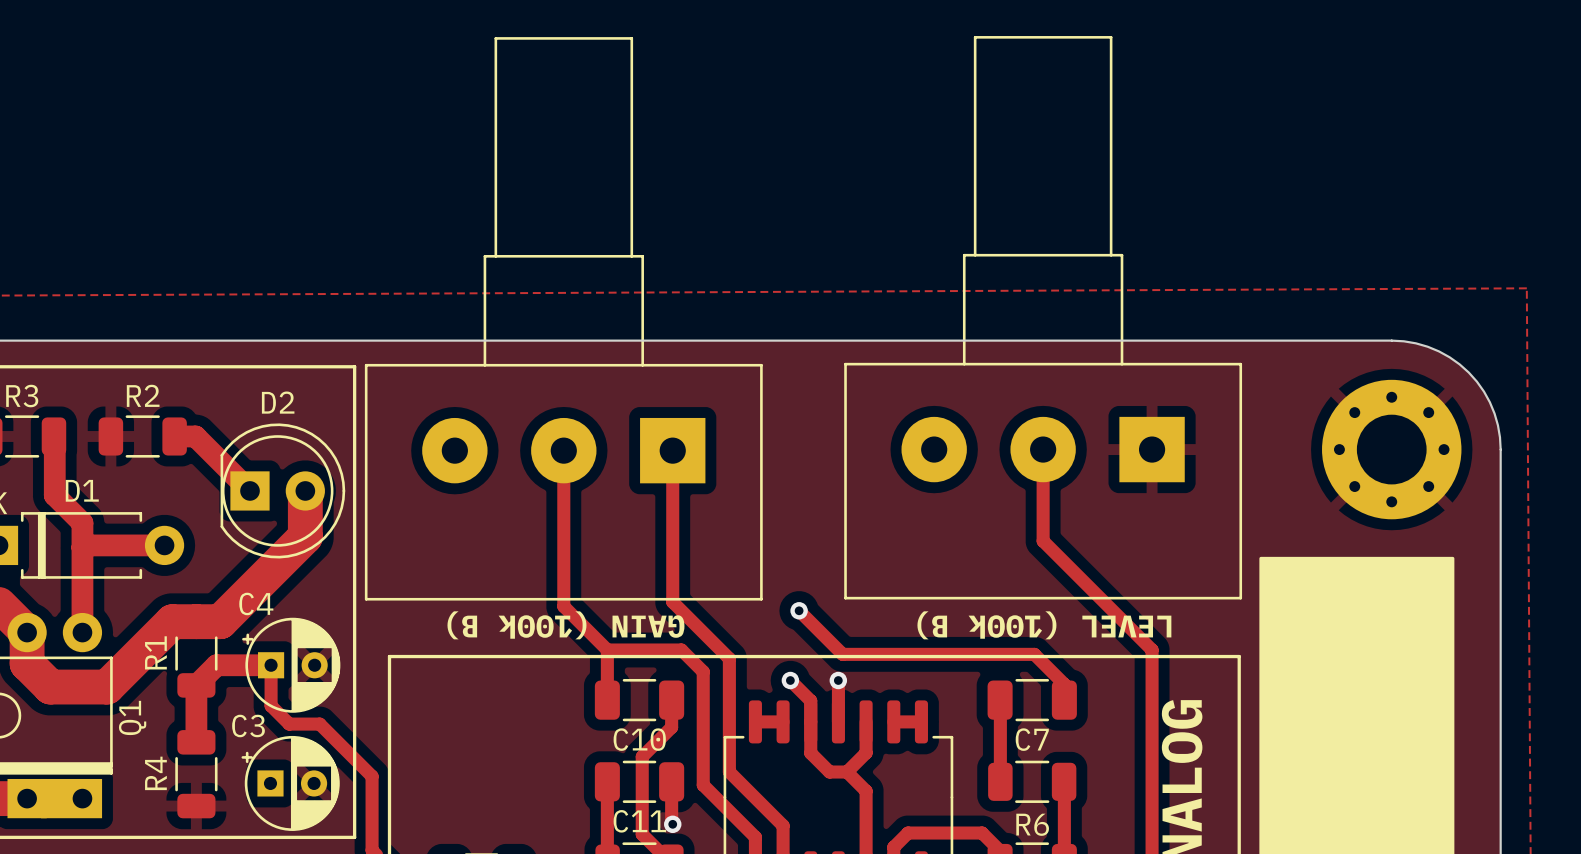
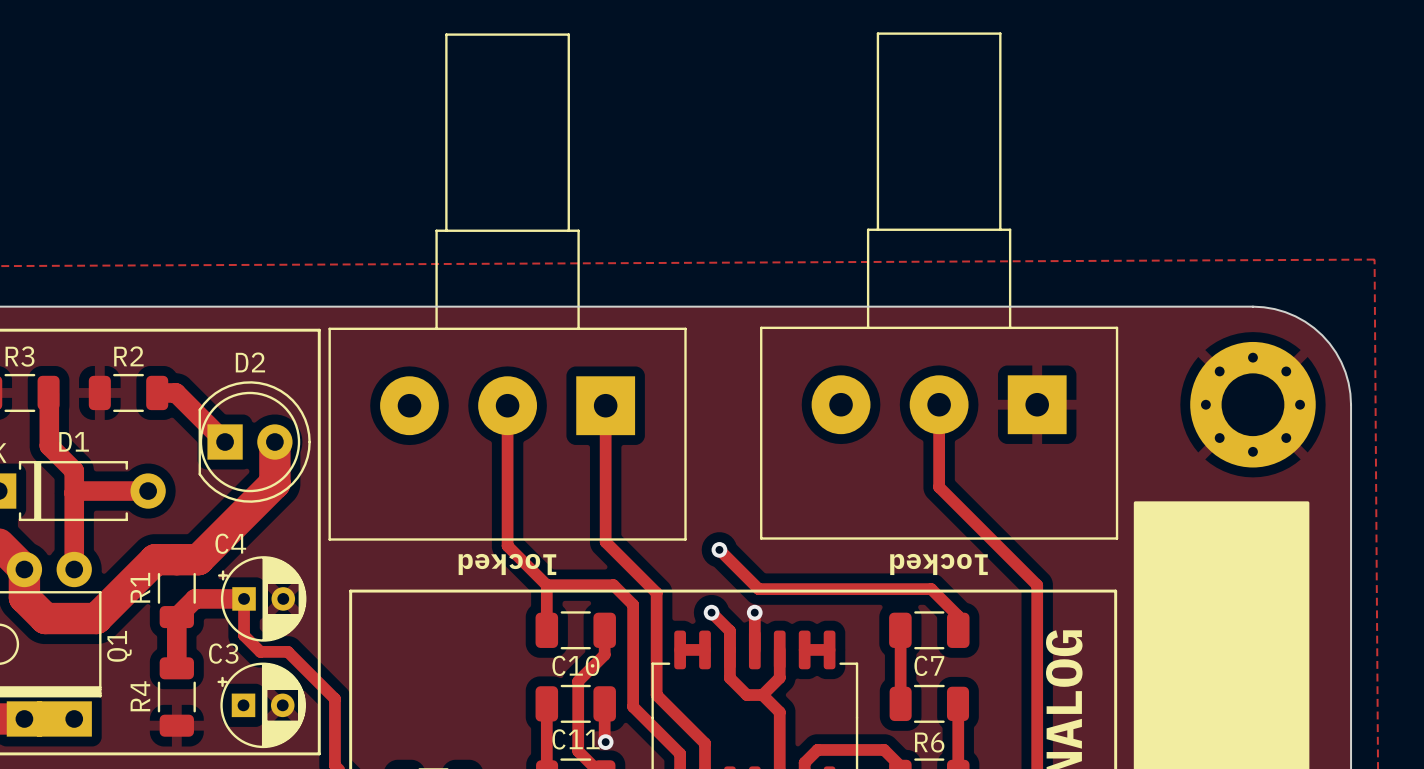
text: GAIN (100k B) (565, 625) -> locked (507, 564)
text: LEVEL (100k B) (1044, 625) -> locked (939, 564)

